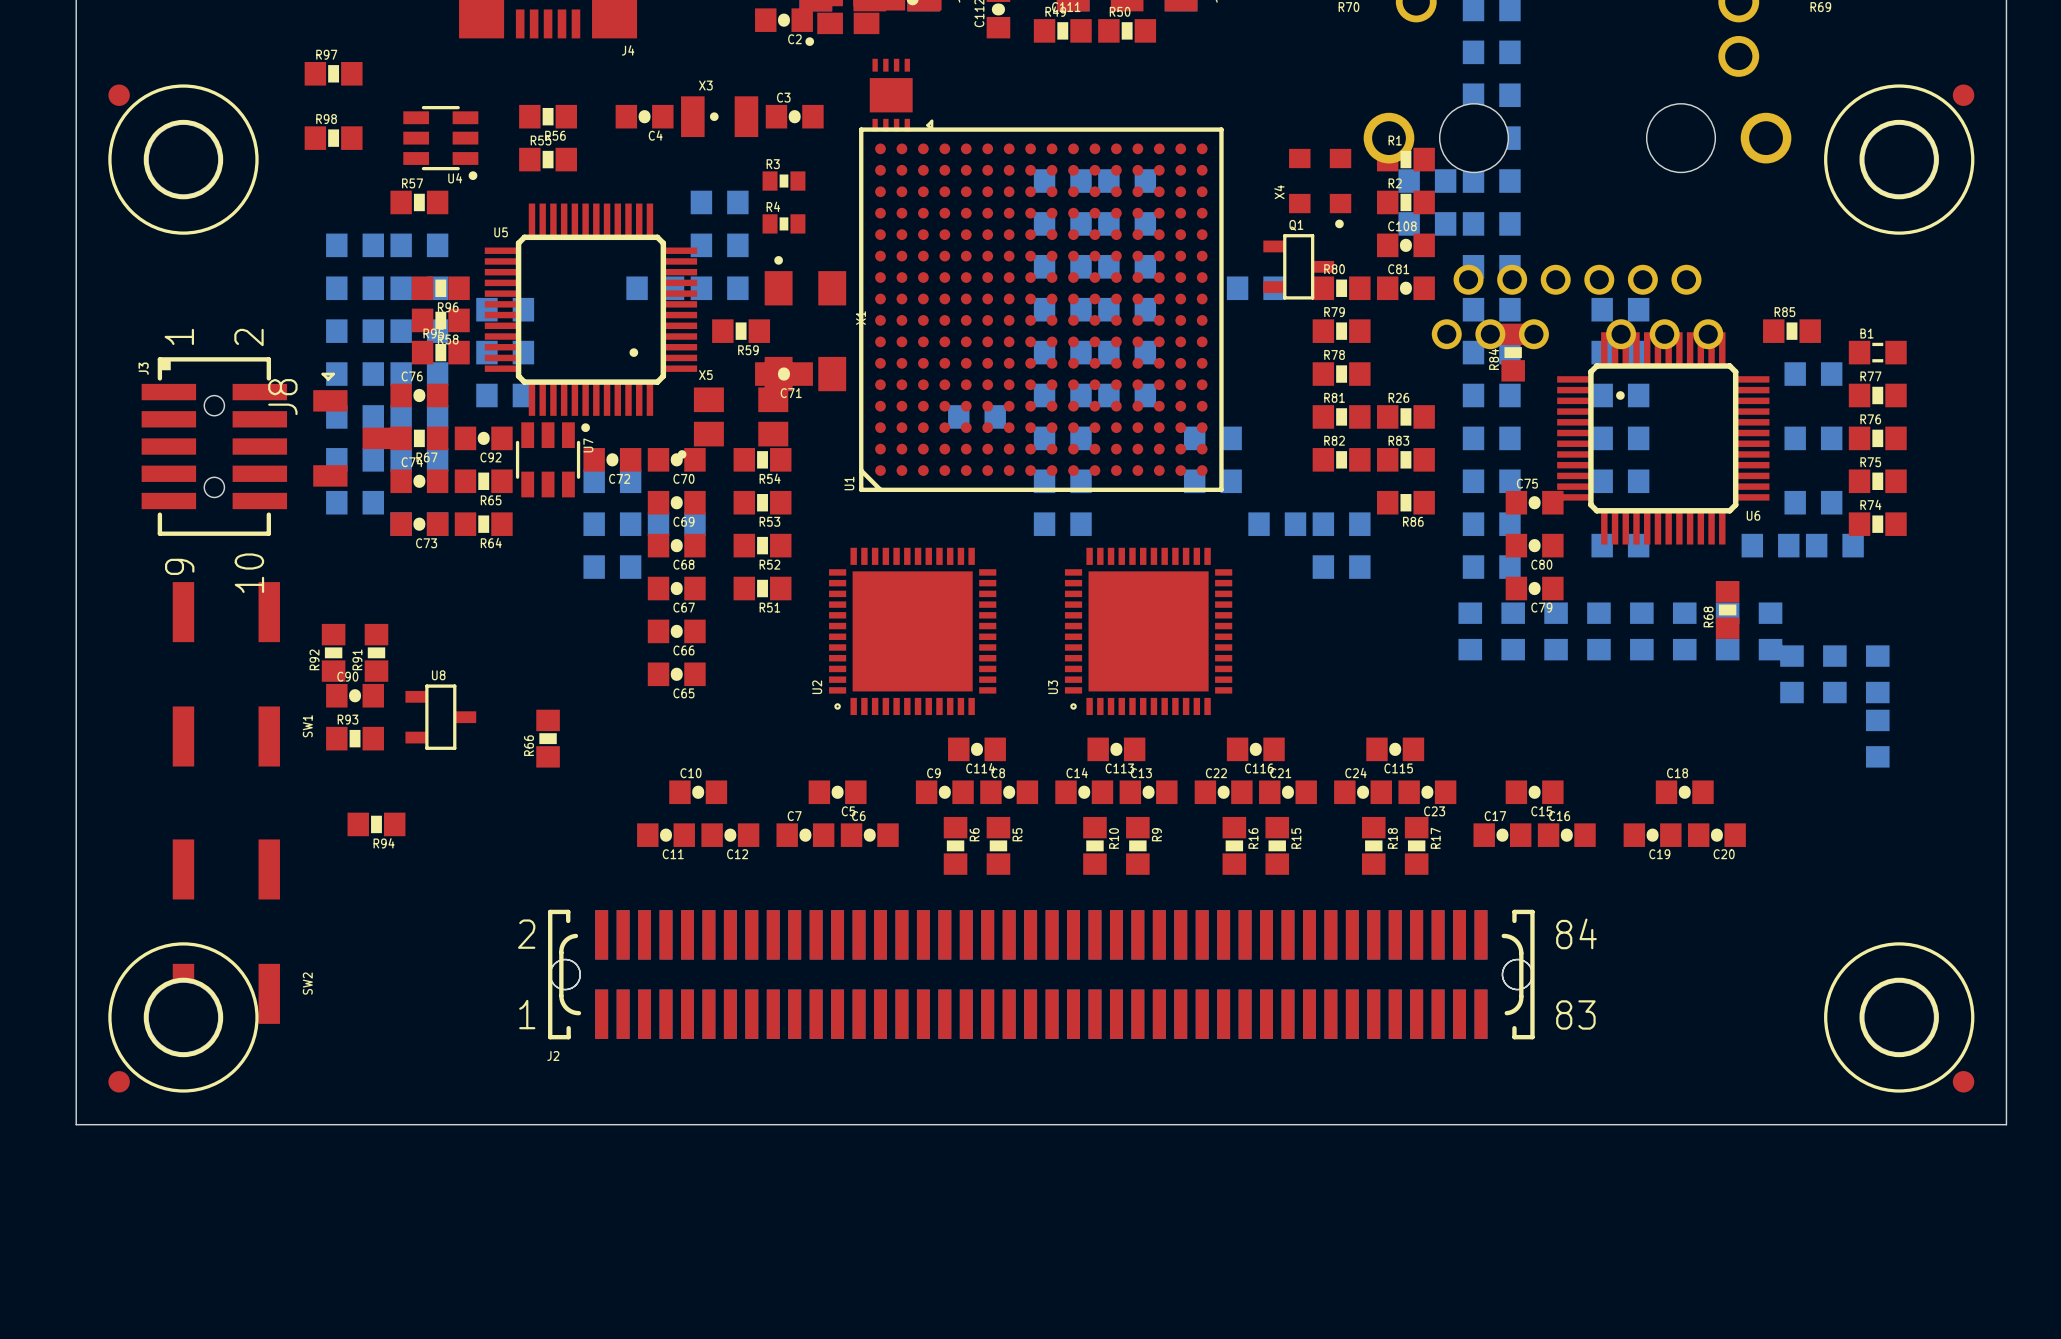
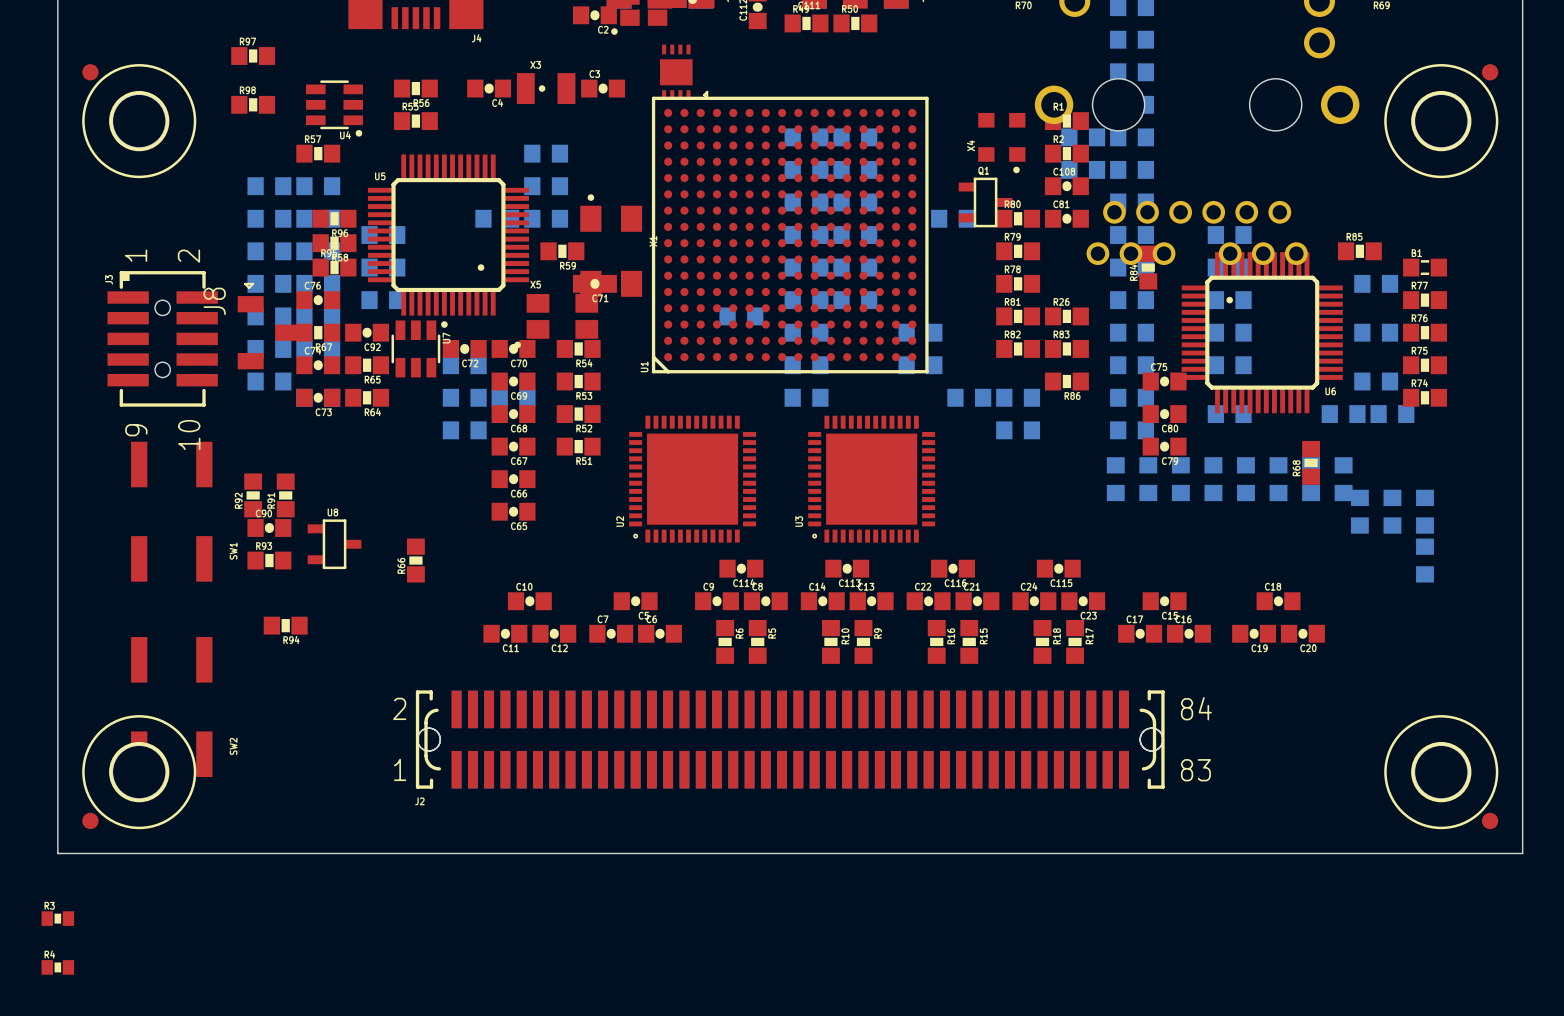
R3 position: (783, 181) -> (57, 918)
R4 position: (783, 223) -> (57, 967)

